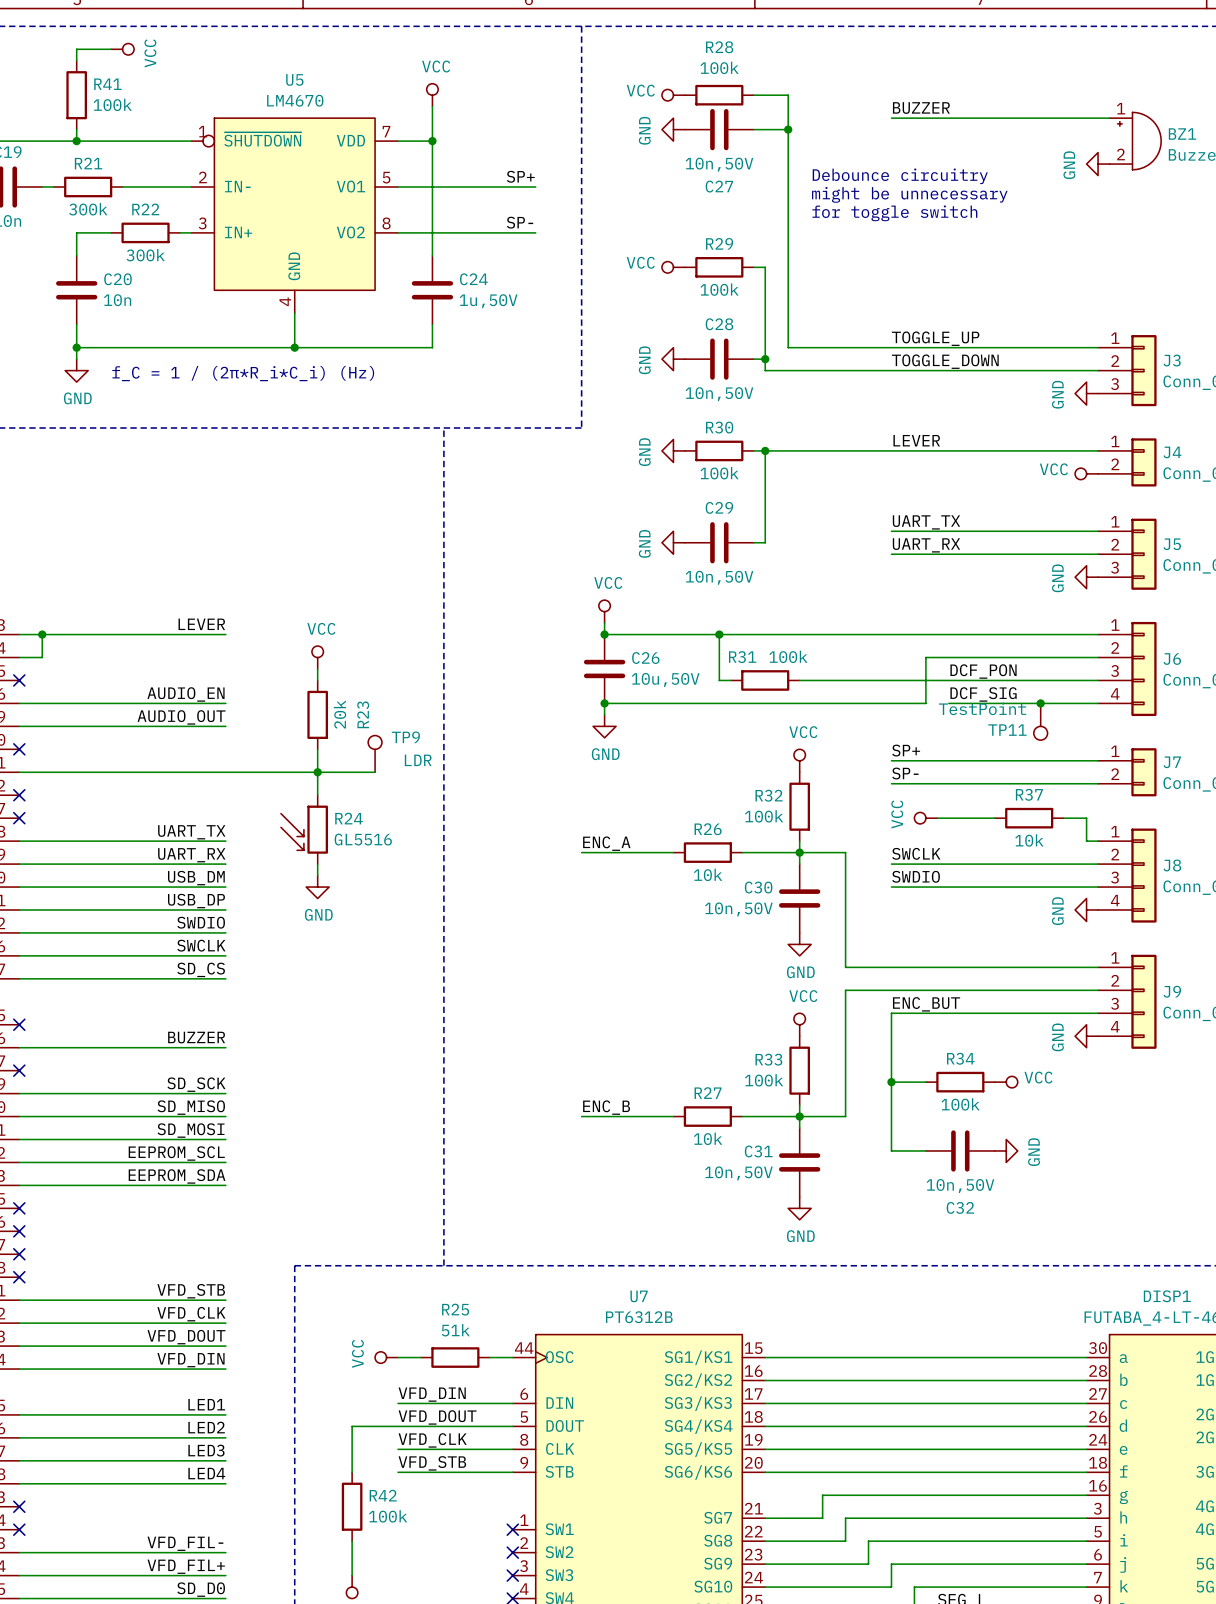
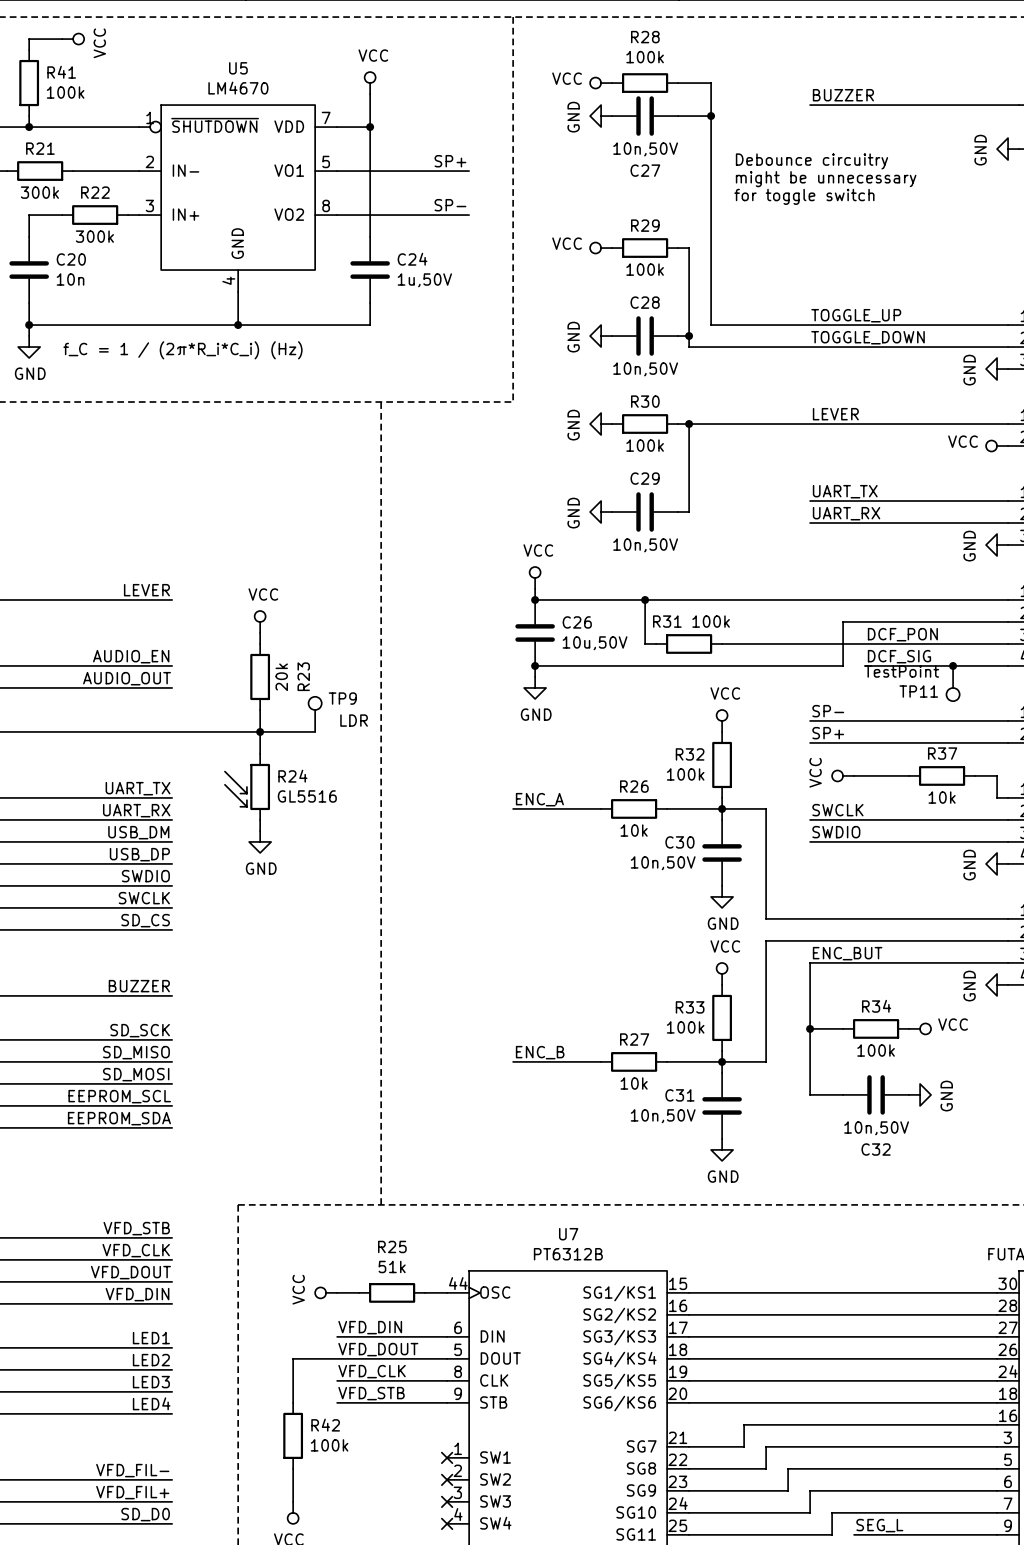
label: SP+ (906, 750) -> SP- (828, 711)
label: SP- (905, 773) -> SP+ (828, 733)

